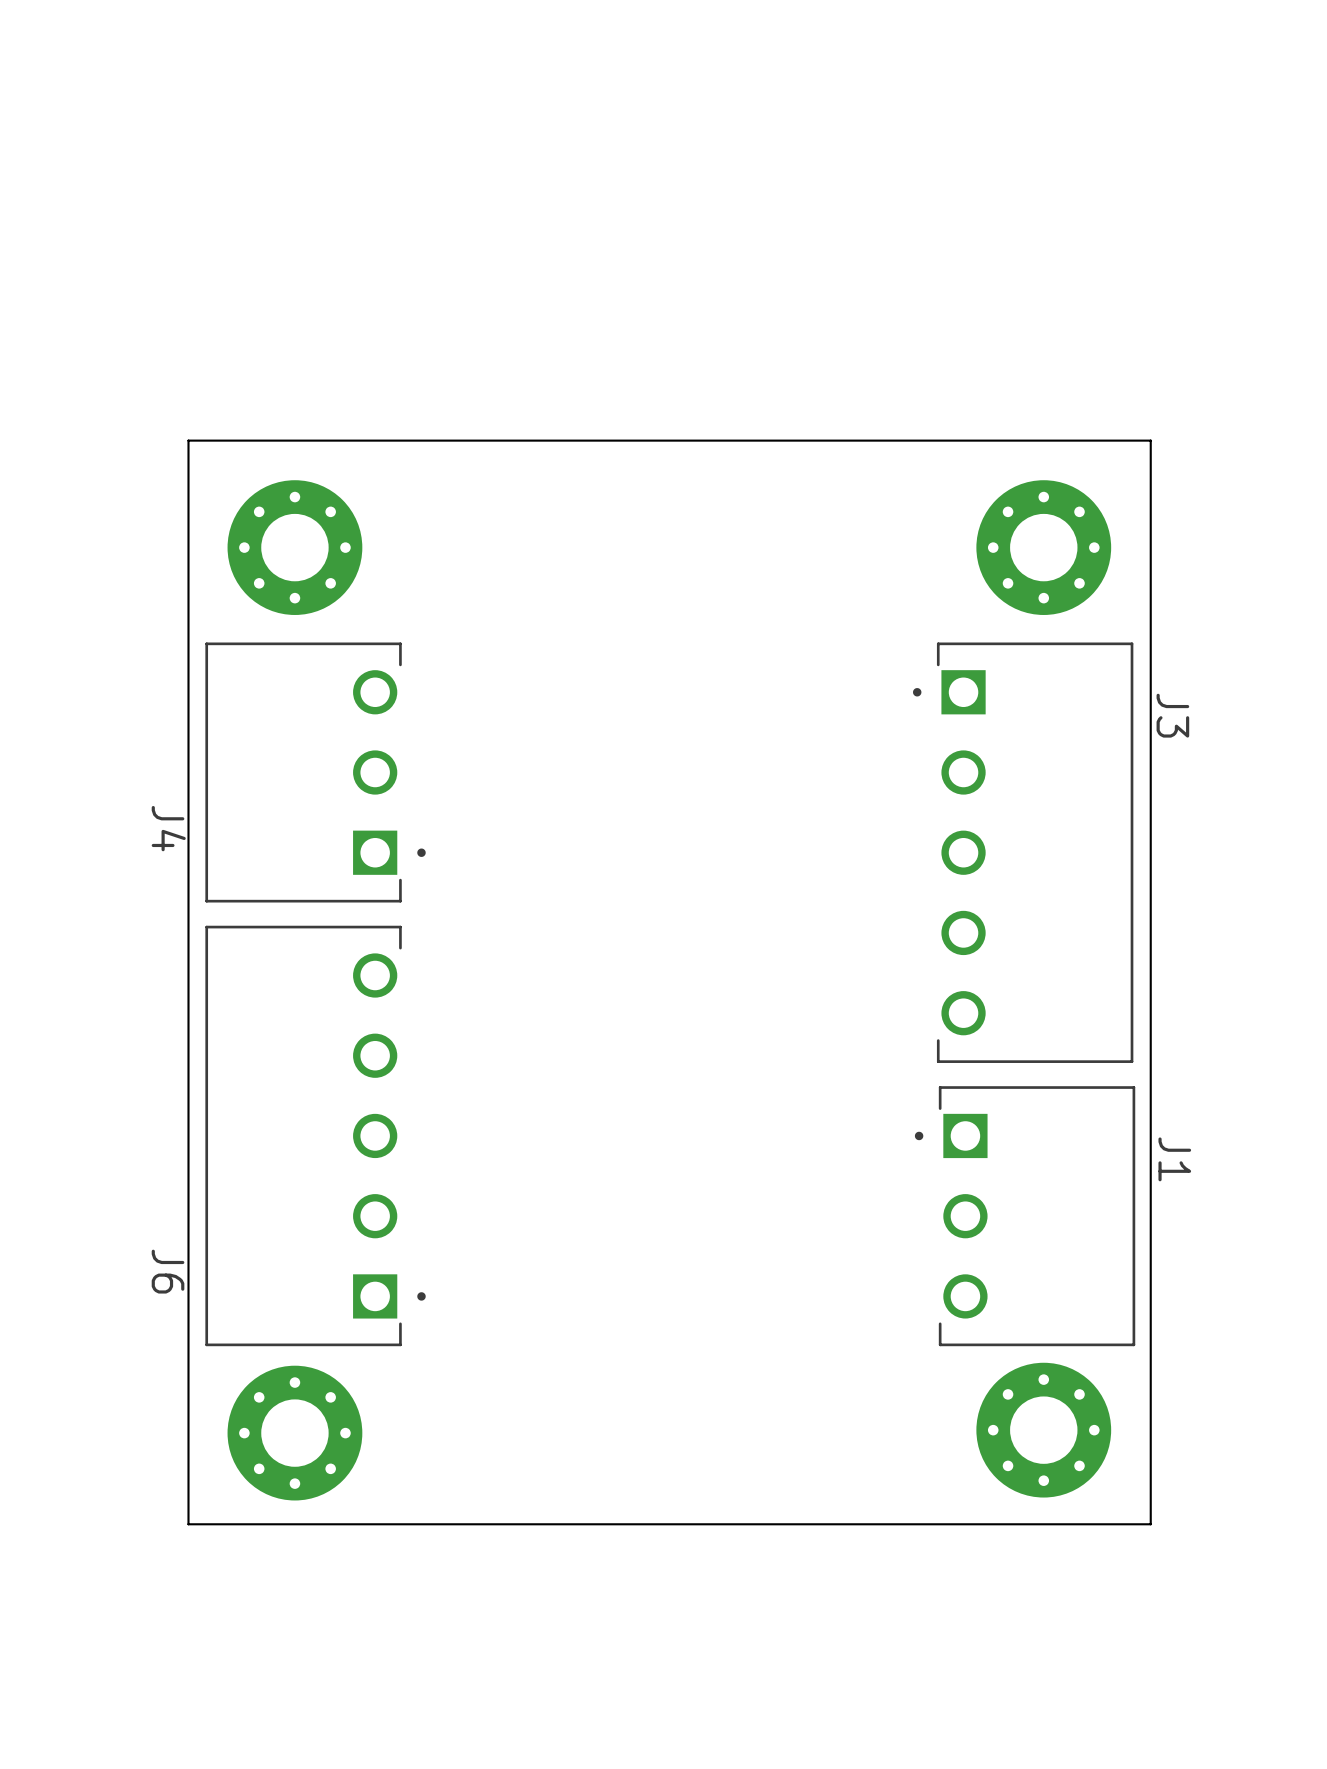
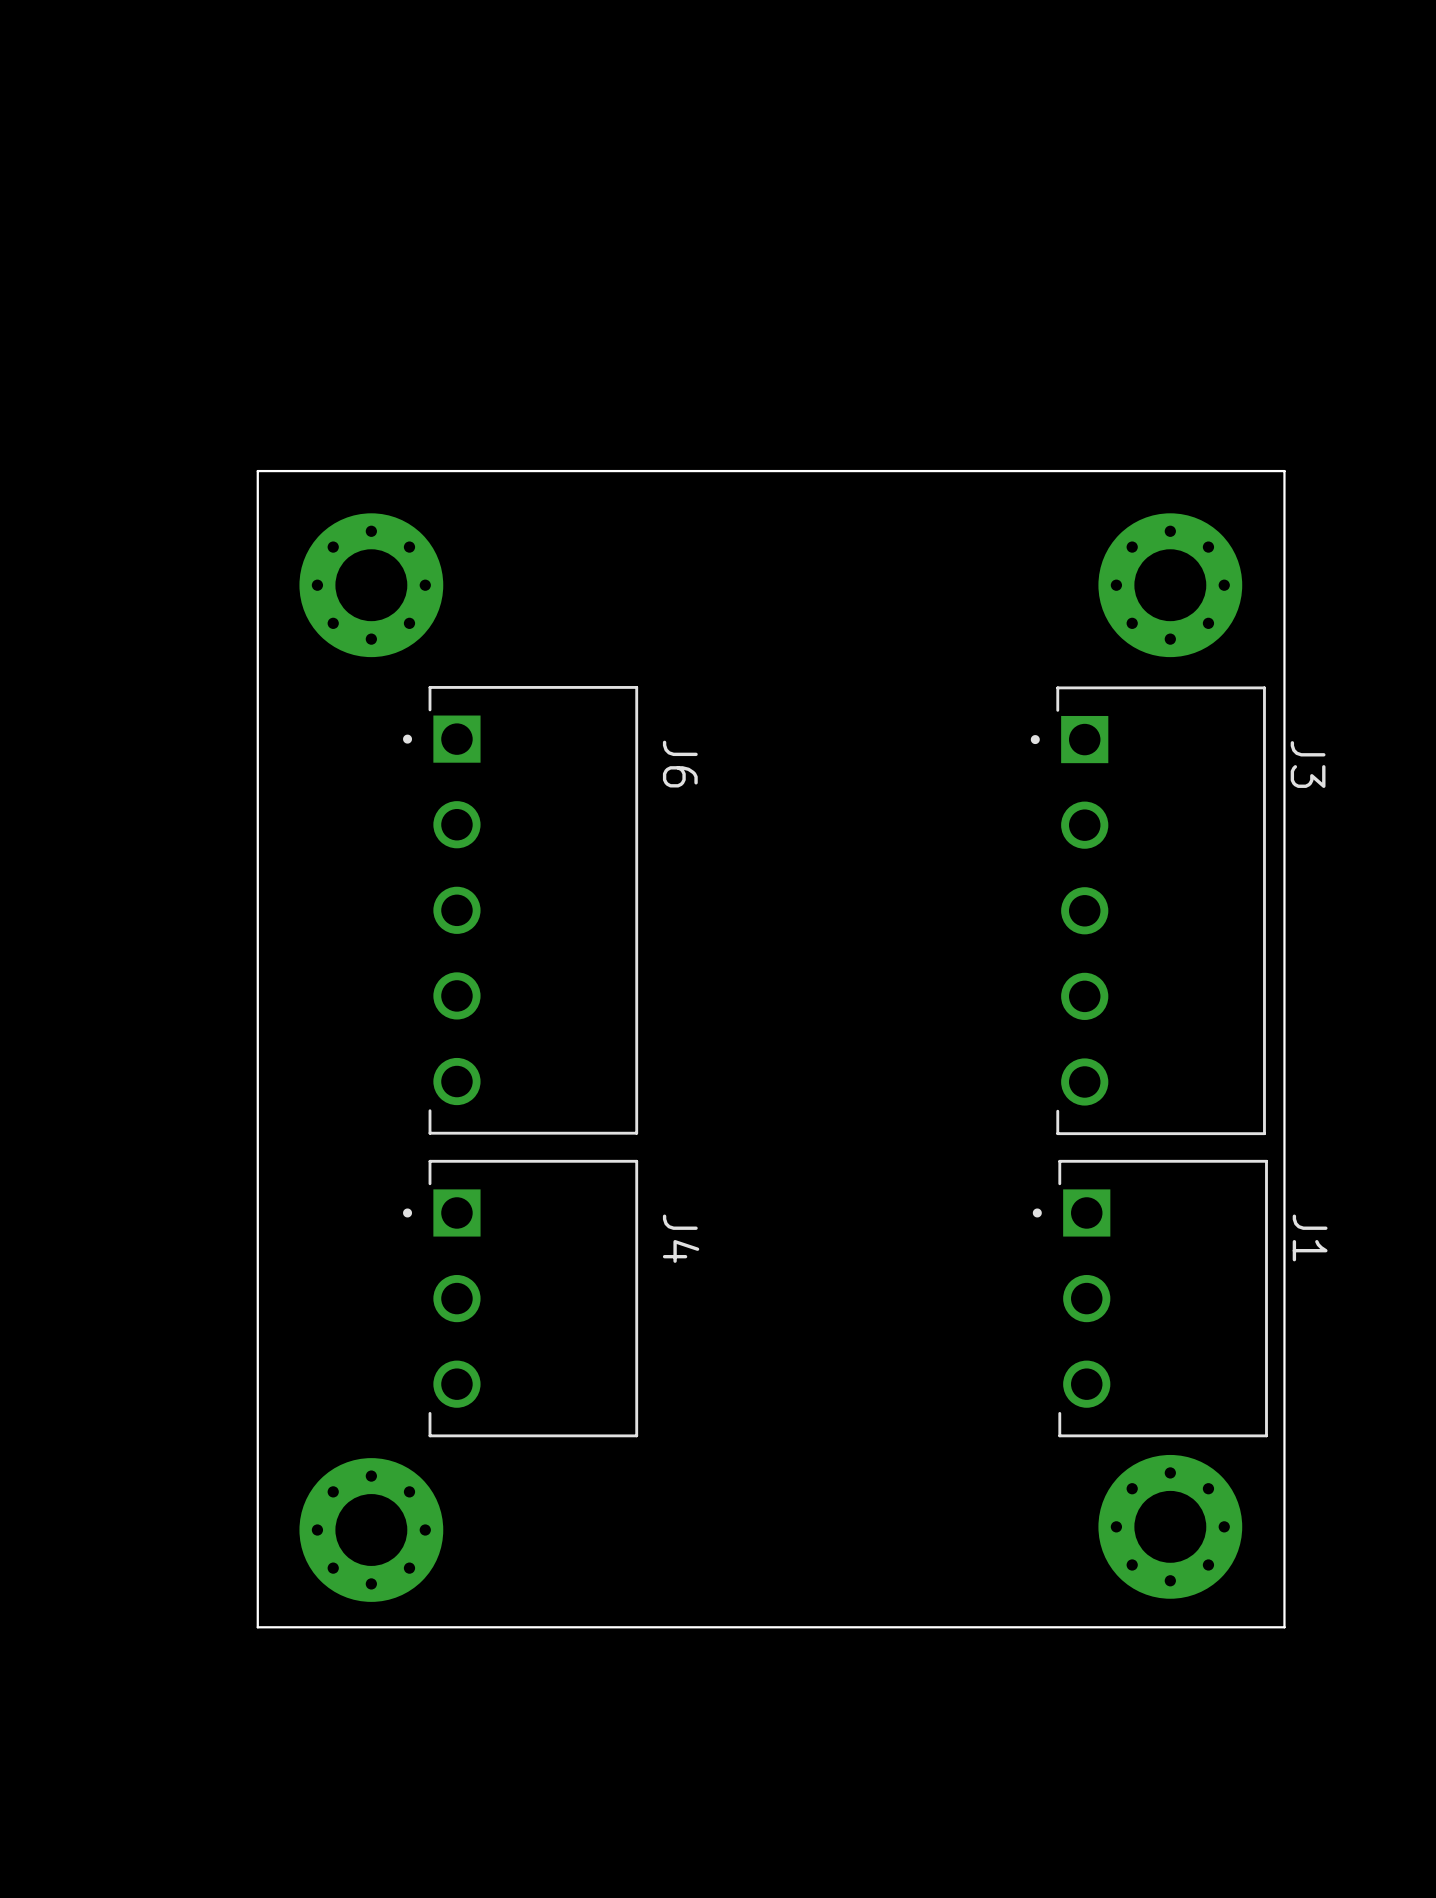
J4 rotation: 0° (315, 772) -> 180° (520, 1298)
J4 position: (315, 772) -> (520, 1298)
J6 rotation: 0° (315, 1135) -> 180° (520, 910)
J6 position: (315, 1135) -> (520, 910)

